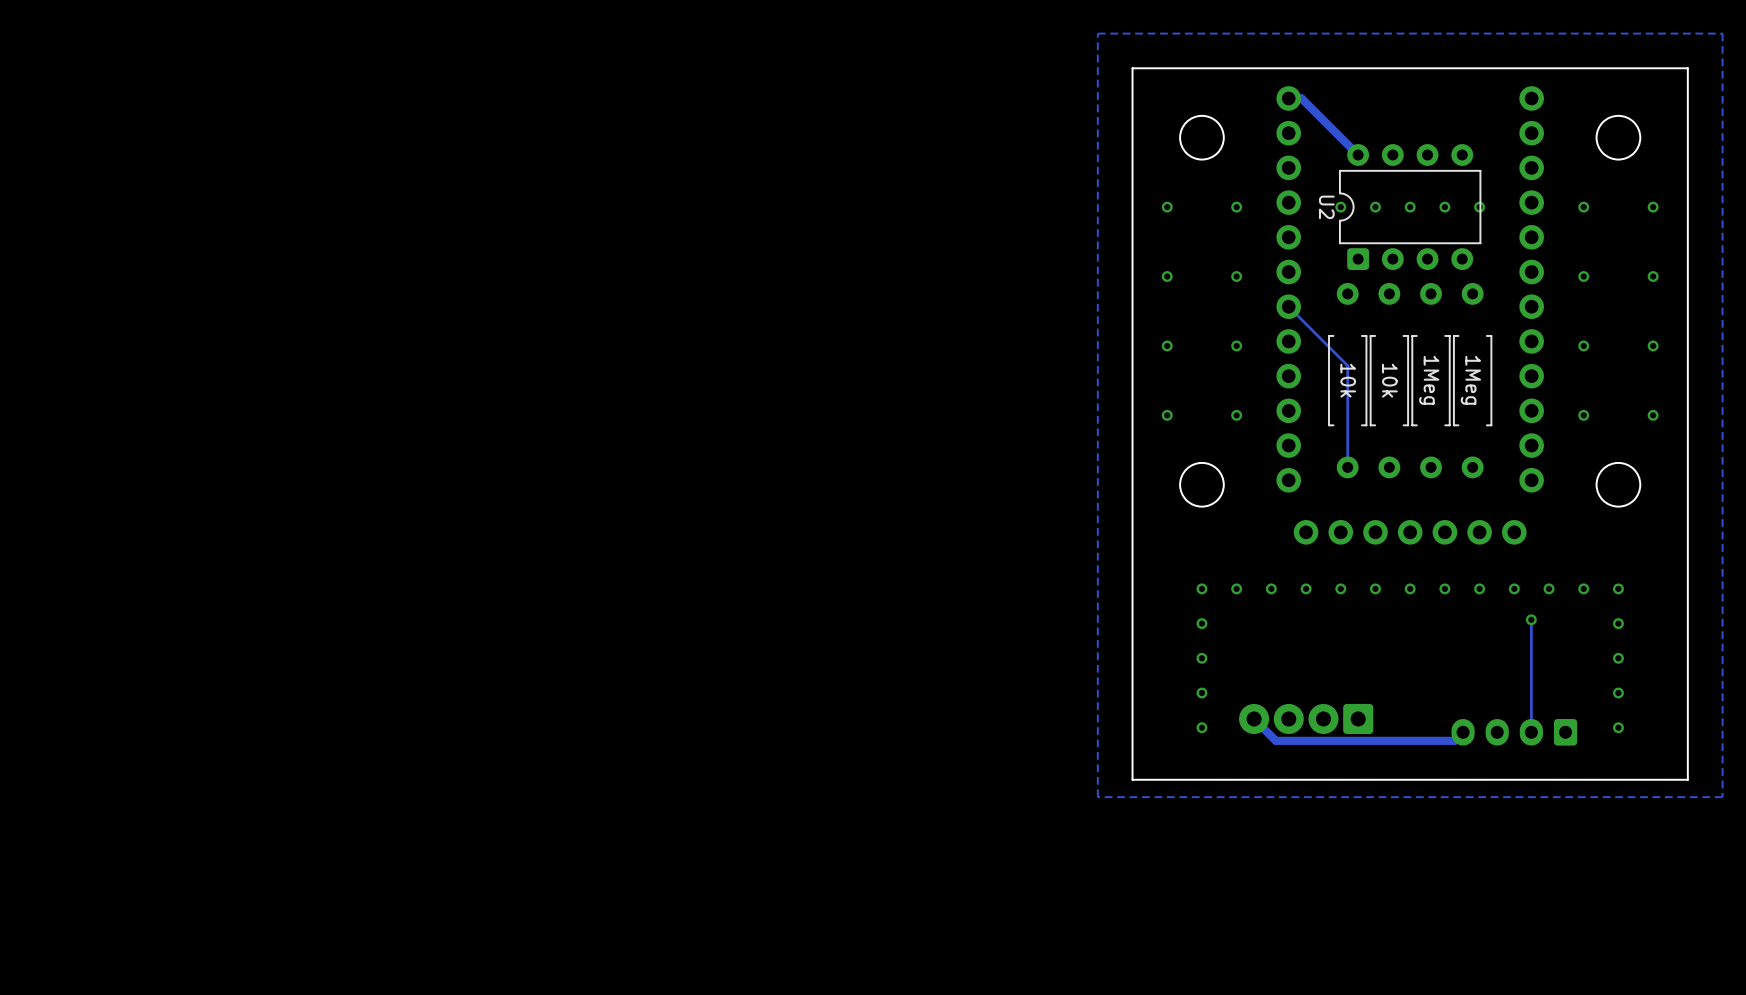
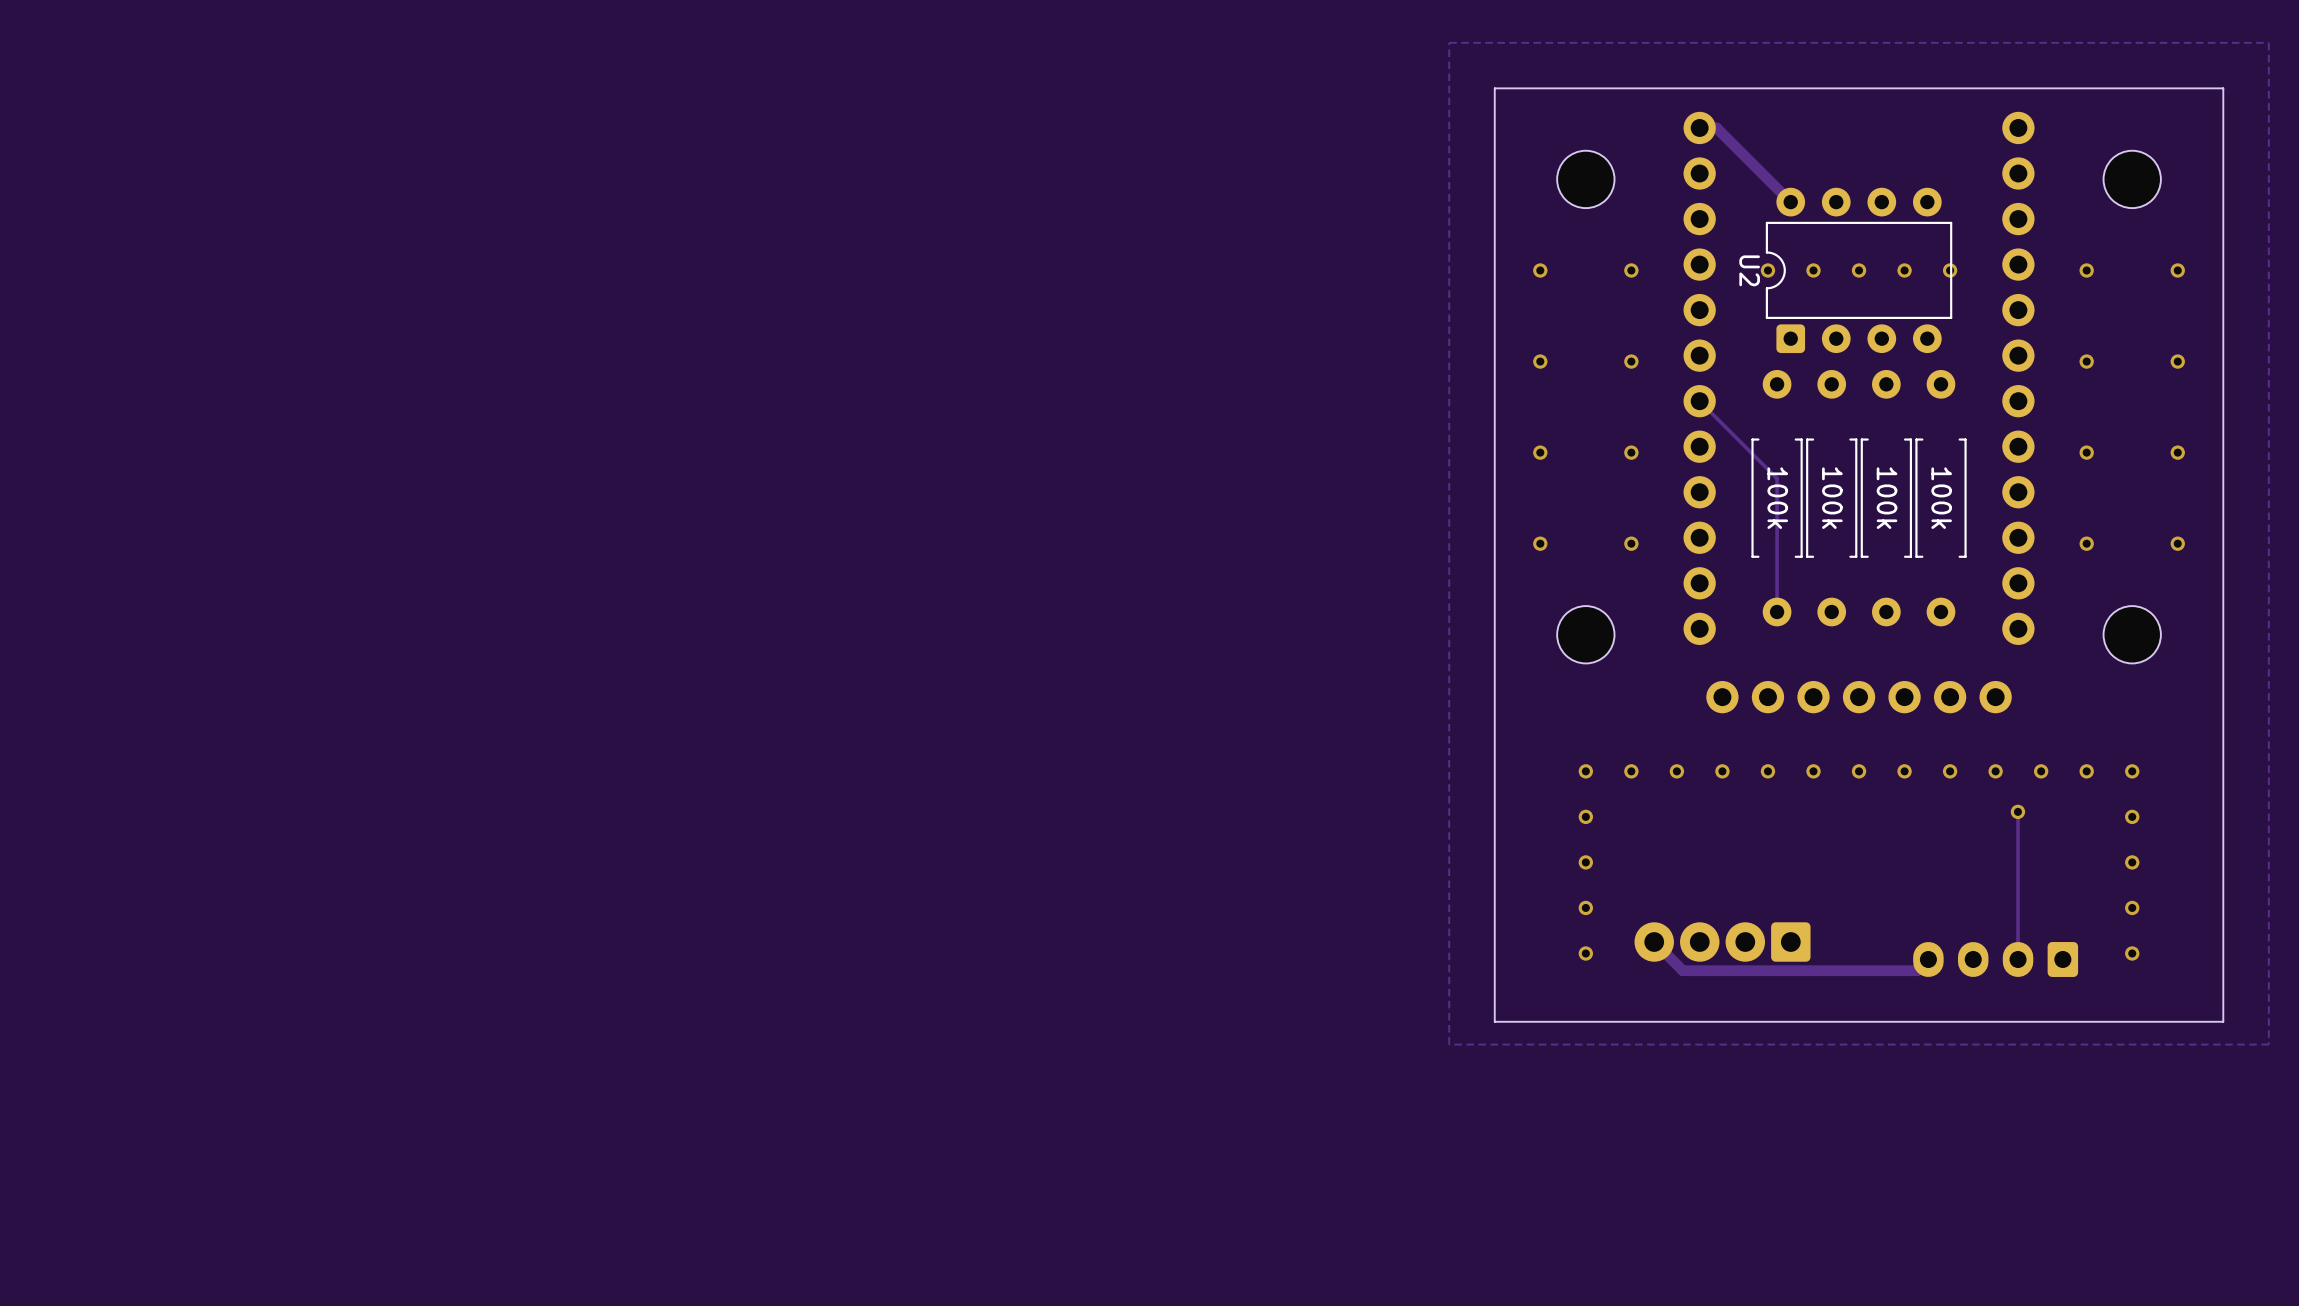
part value: 10k (1348, 380) -> 100k (1777, 498)
part value: 10k (1389, 380) -> 100k (1832, 498)
part value: 1Meg (1429, 380) -> 100k (1887, 498)
part value: 1Meg (1470, 380) -> 100k (1941, 498)

